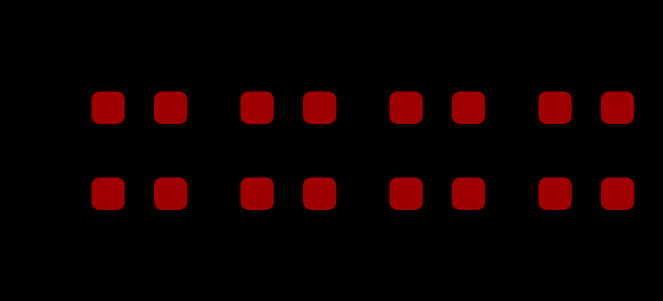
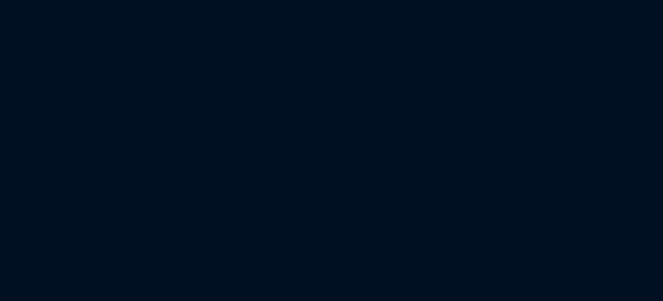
part: (139, 107) -> none
part: (288, 107) -> none
part: (437, 107) -> none
part: (586, 107) -> none
part: (139, 193) -> none
part: (288, 193) -> none
part: (437, 193) -> none
part: (586, 193) -> none

